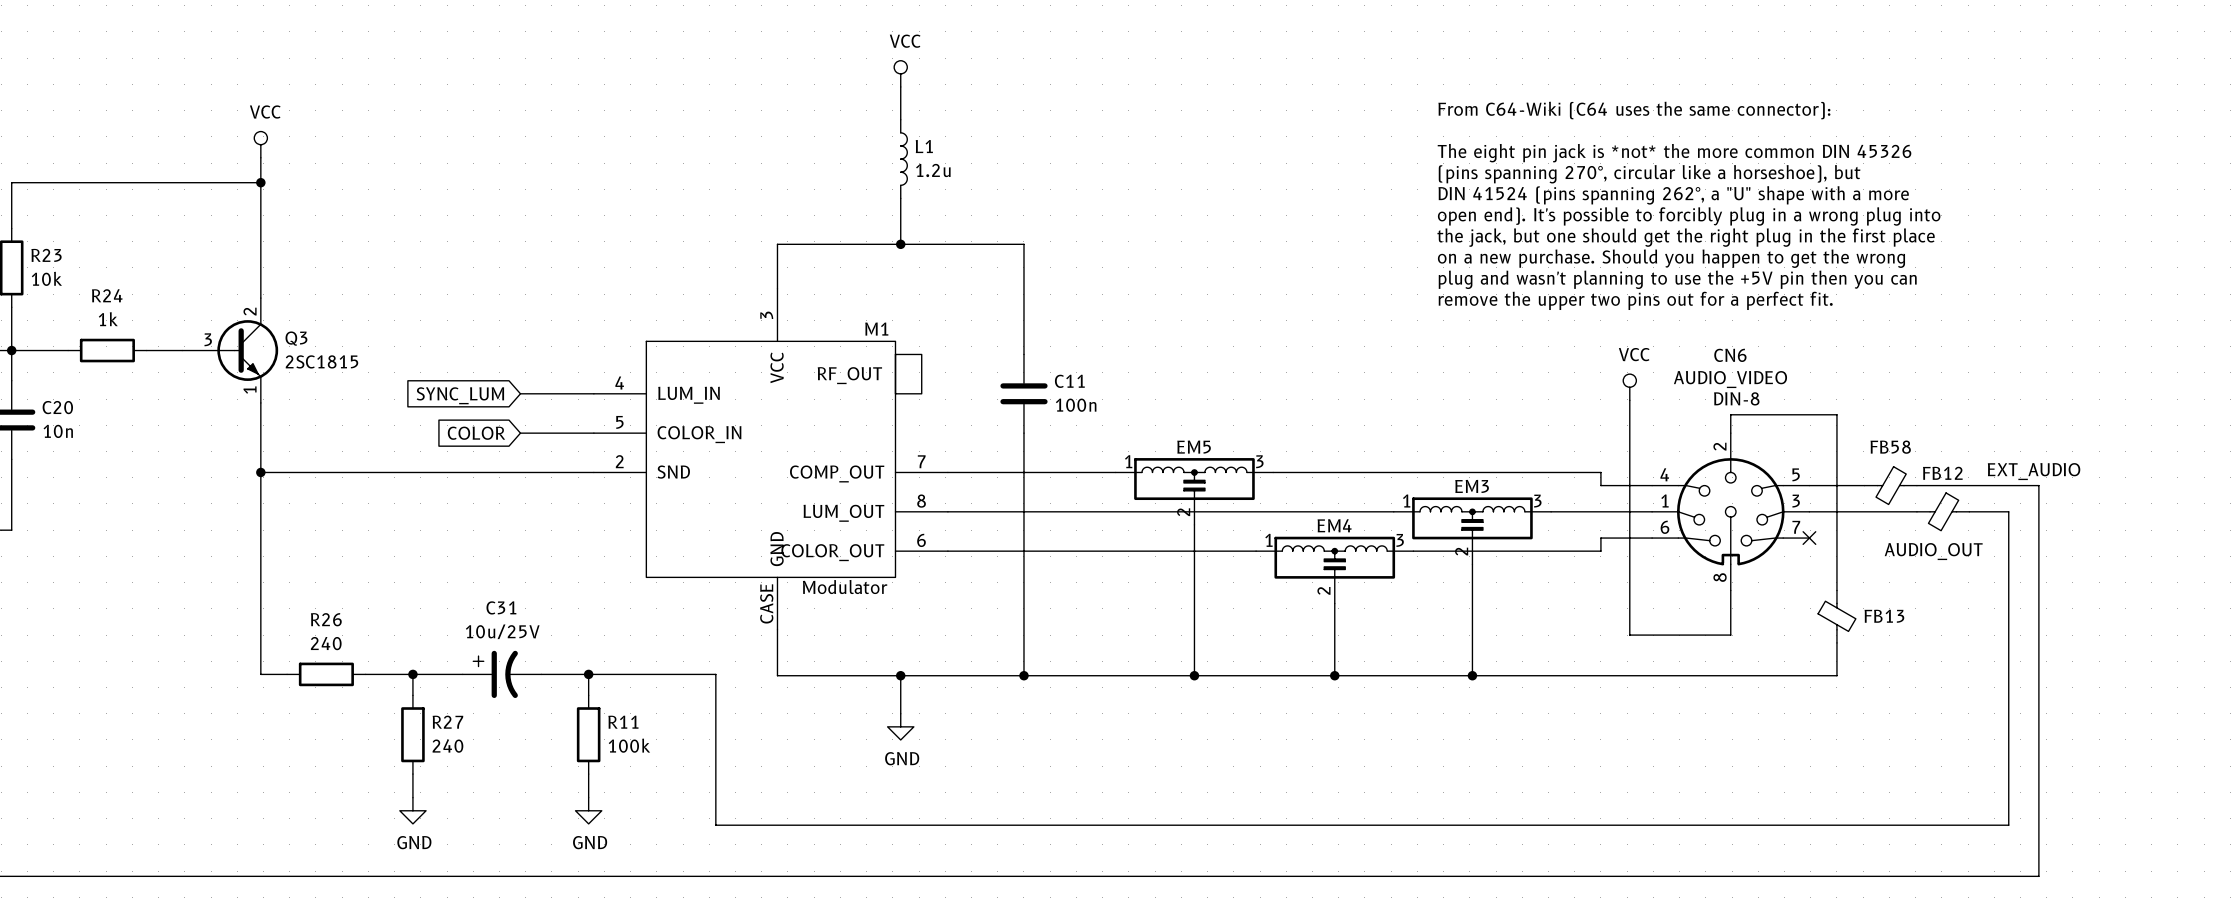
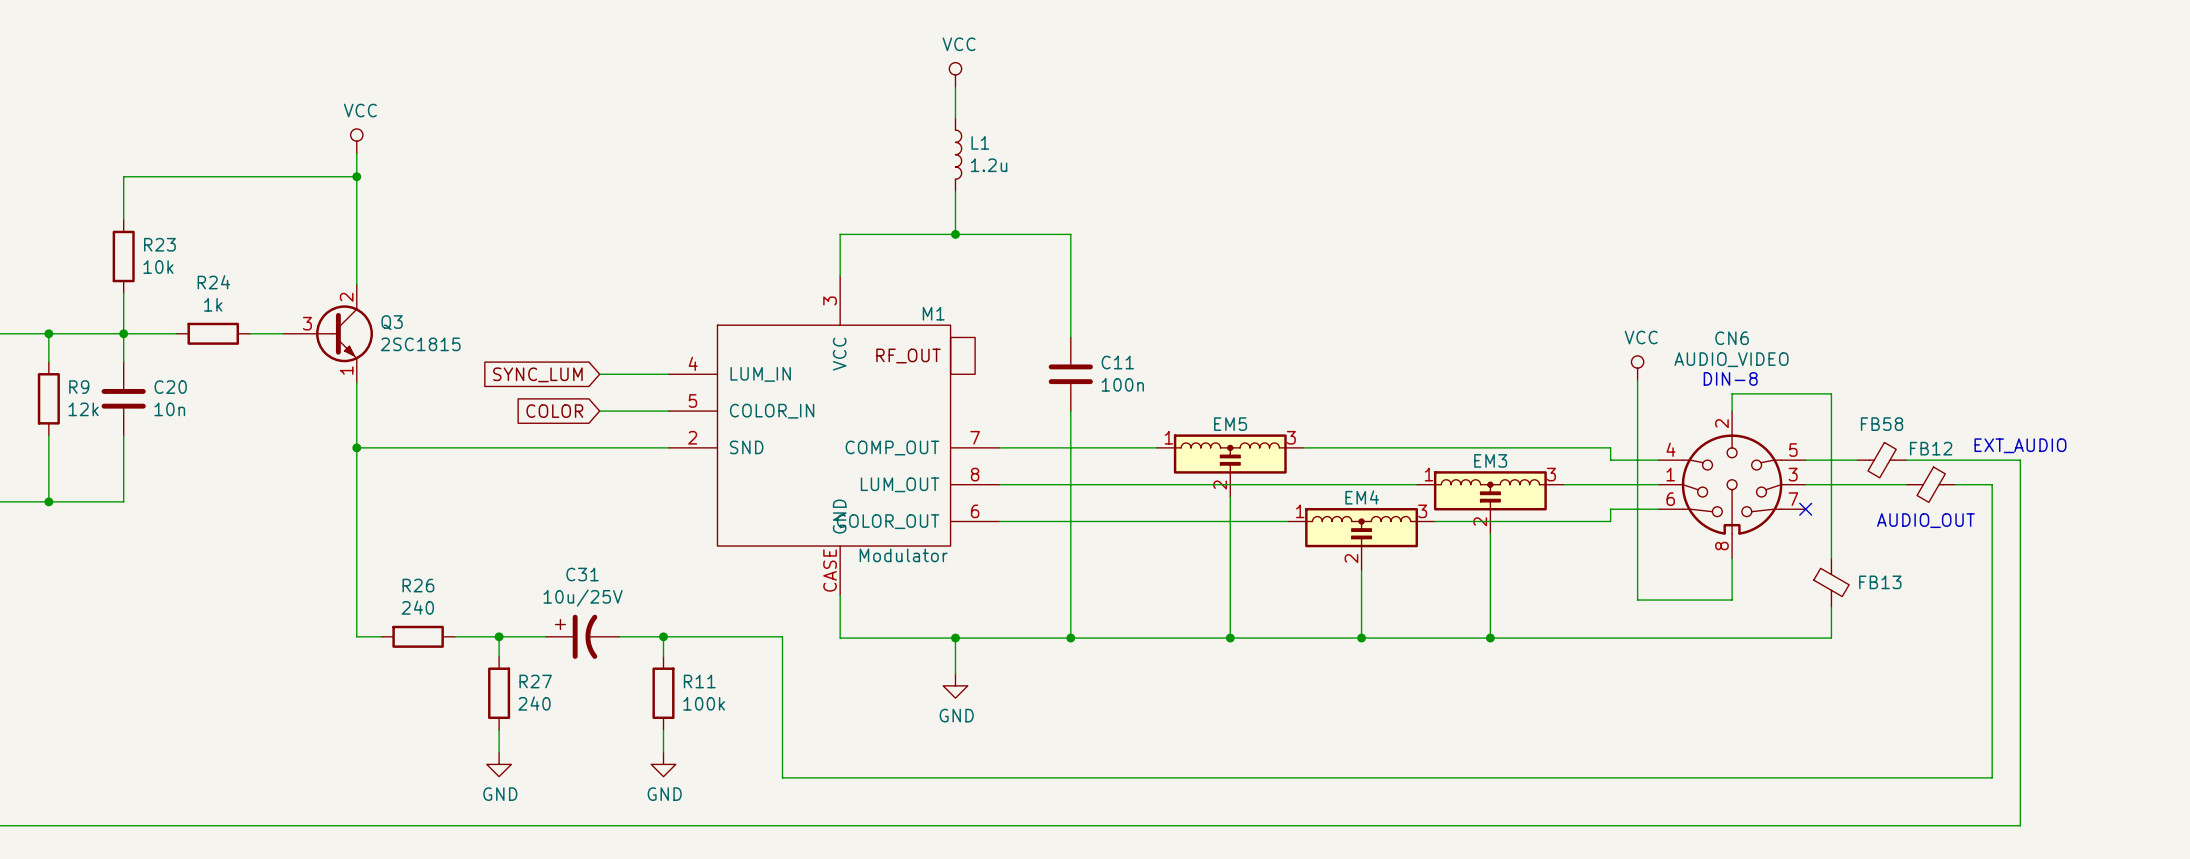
text: From C64-Wiki (C64 uses the same connector): (1634, 110) -> none
text: The eight pin jack is *not* the more common DIN 45326 (1674, 153) -> none
text: (pins spanning 270°, circular like a horseshoe), but (1649, 174) -> none
text: DIN 41524 (pins spanning 262°, a "U" shape with a more (1673, 195) -> none
text: open end). It's possible to forcibly plug in a wrong plug into (1689, 216) -> none
text: the jack, but one should get the right plug in the first place (1686, 237) -> none
text: on a new purchase. Should you happen to get the wrong (1671, 258) -> none
text: plug and wasn't planning to use the +5V pin then you can (1677, 279) -> none
text: remove the upper two pins out for a perfect fit. (1635, 300) -> none

